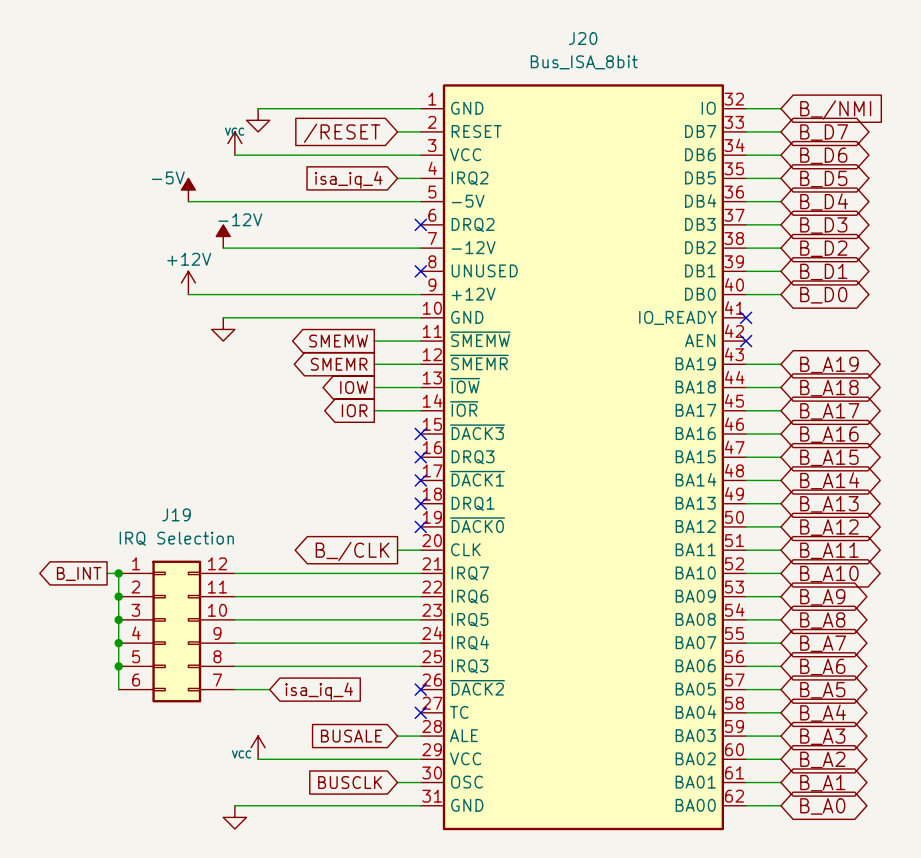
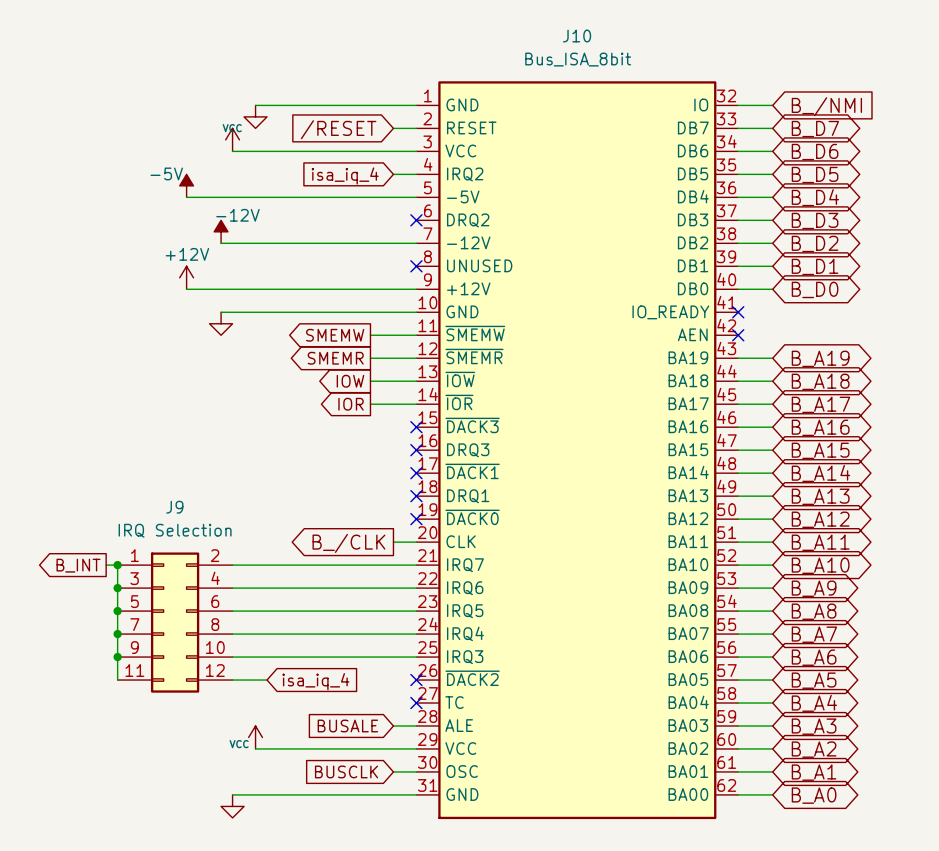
J20 name: J20 (583, 38) -> J10 (577, 36)
J19 name: J19 (176, 514) -> J9 (174, 507)
J19 symbol: [118, 560, 235, 703] -> [117, 552, 233, 693]

